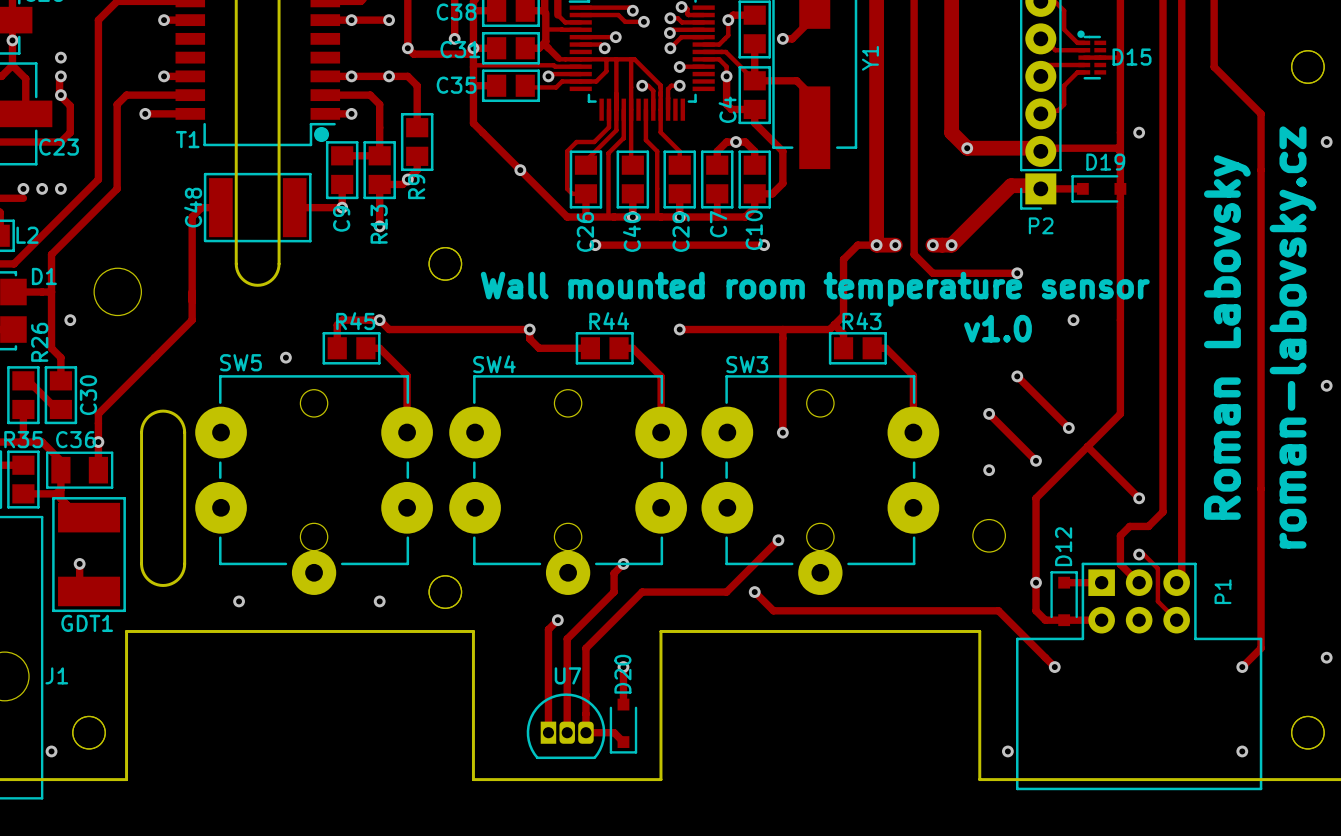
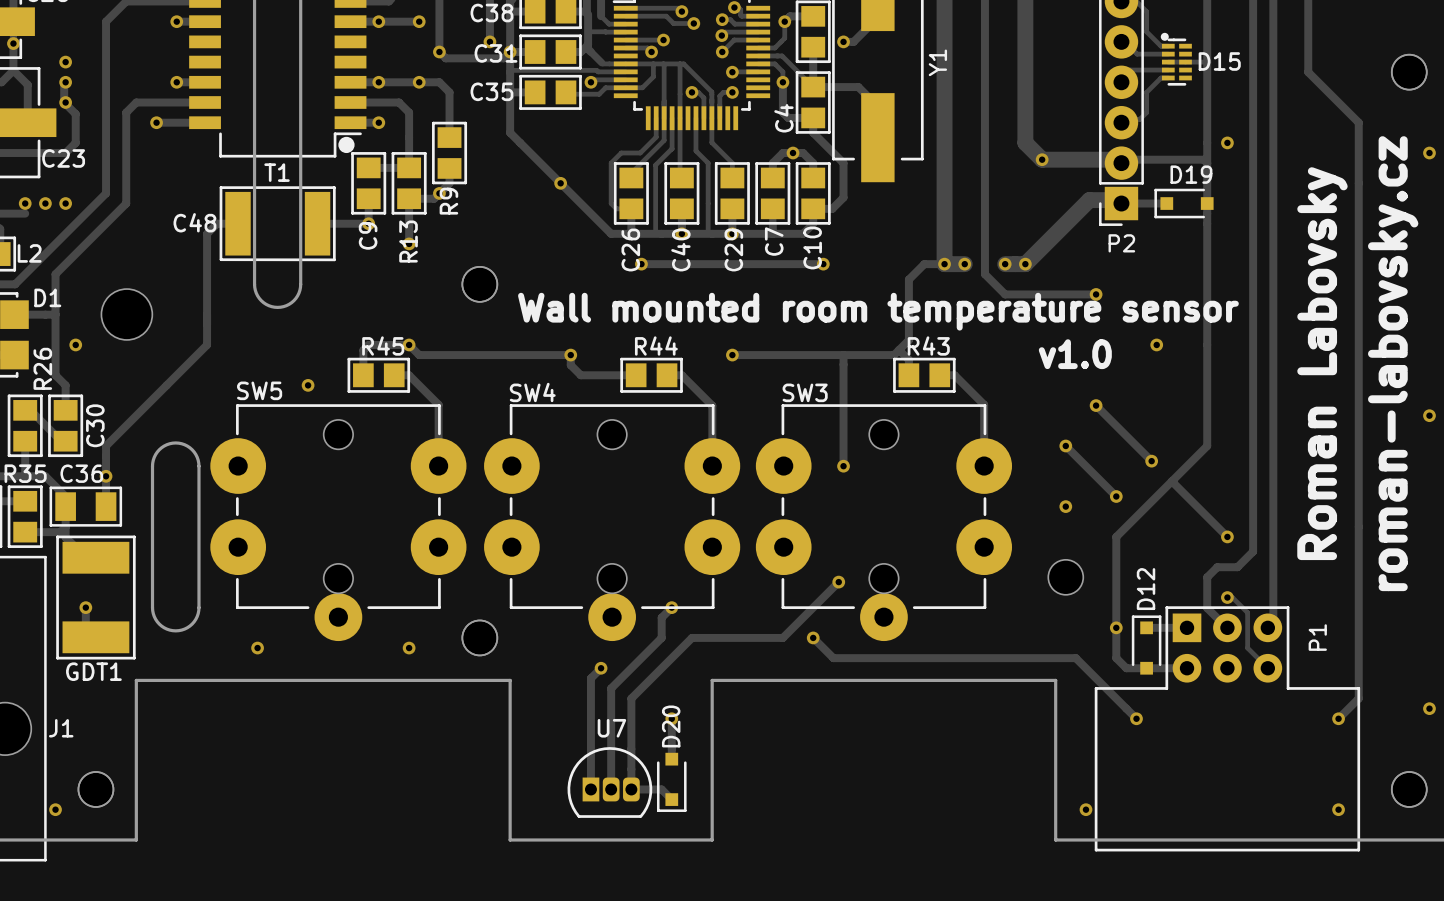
T1 name position: T1 (187, 139) -> T1 (277, 172)
C48 name rotation: 0° (193, 207) -> 90° clockwise (194, 222)

